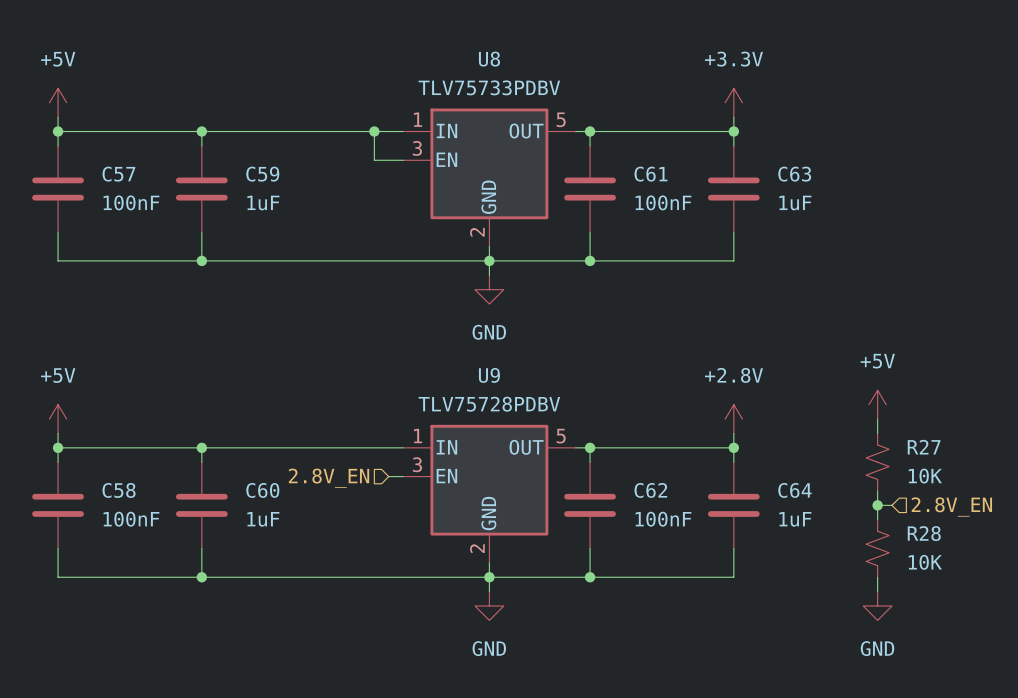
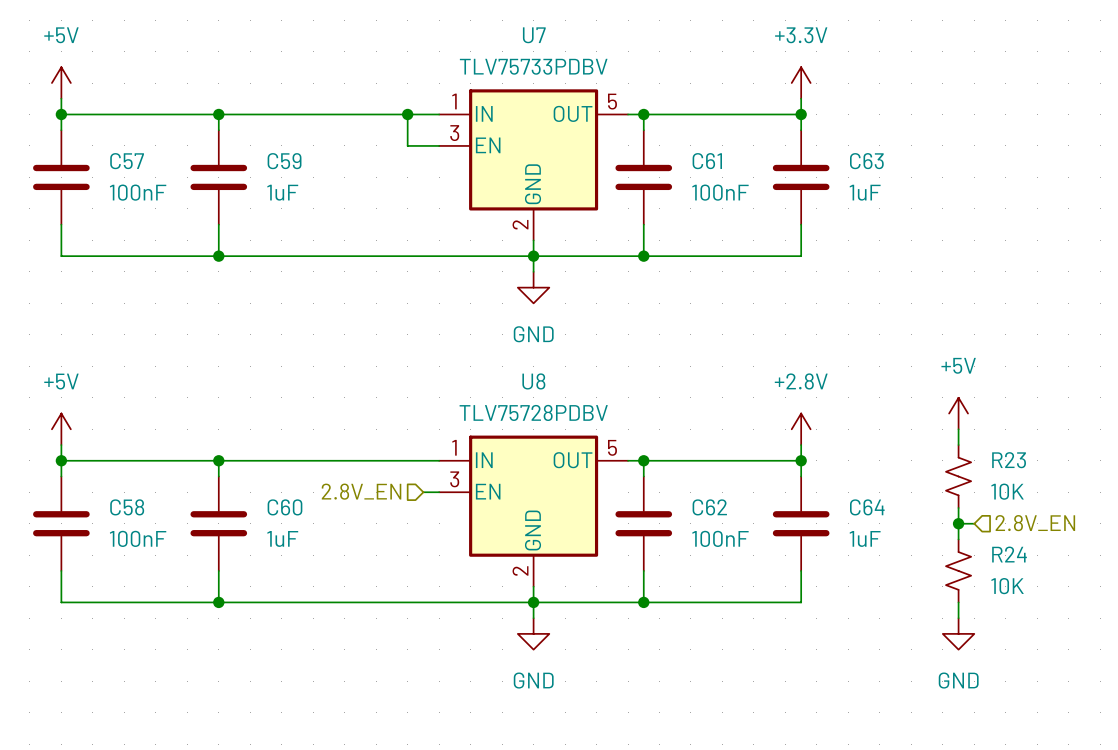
U8 name: U8 (489, 59) -> U7 (534, 35)
U9 name: U9 (489, 375) -> U8 (533, 381)
R27 name: R27 (924, 447) -> R23 (1009, 460)
R28 name: R28 (924, 533) -> R24 (1009, 554)

